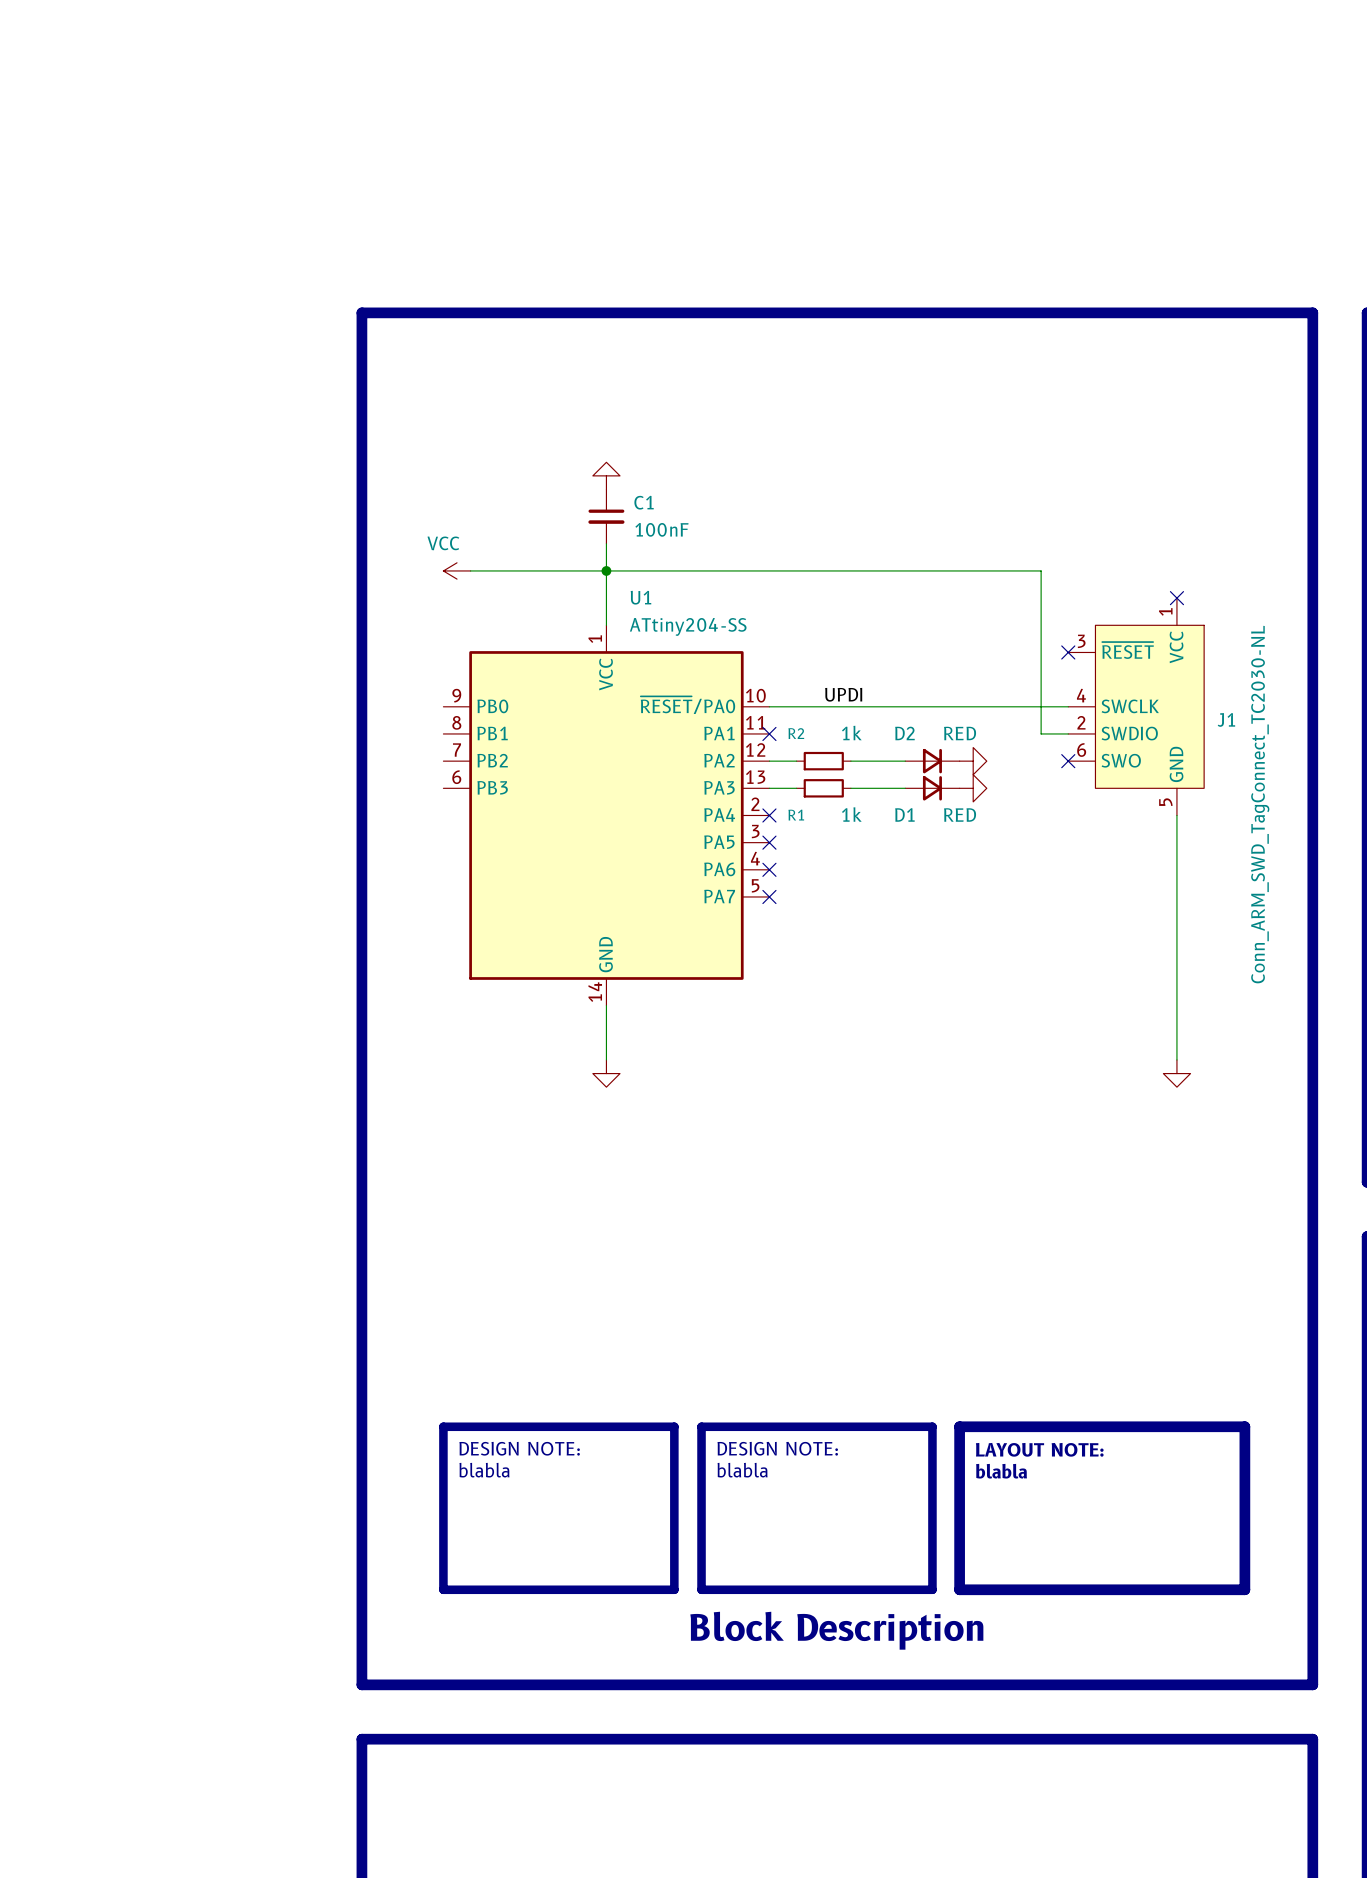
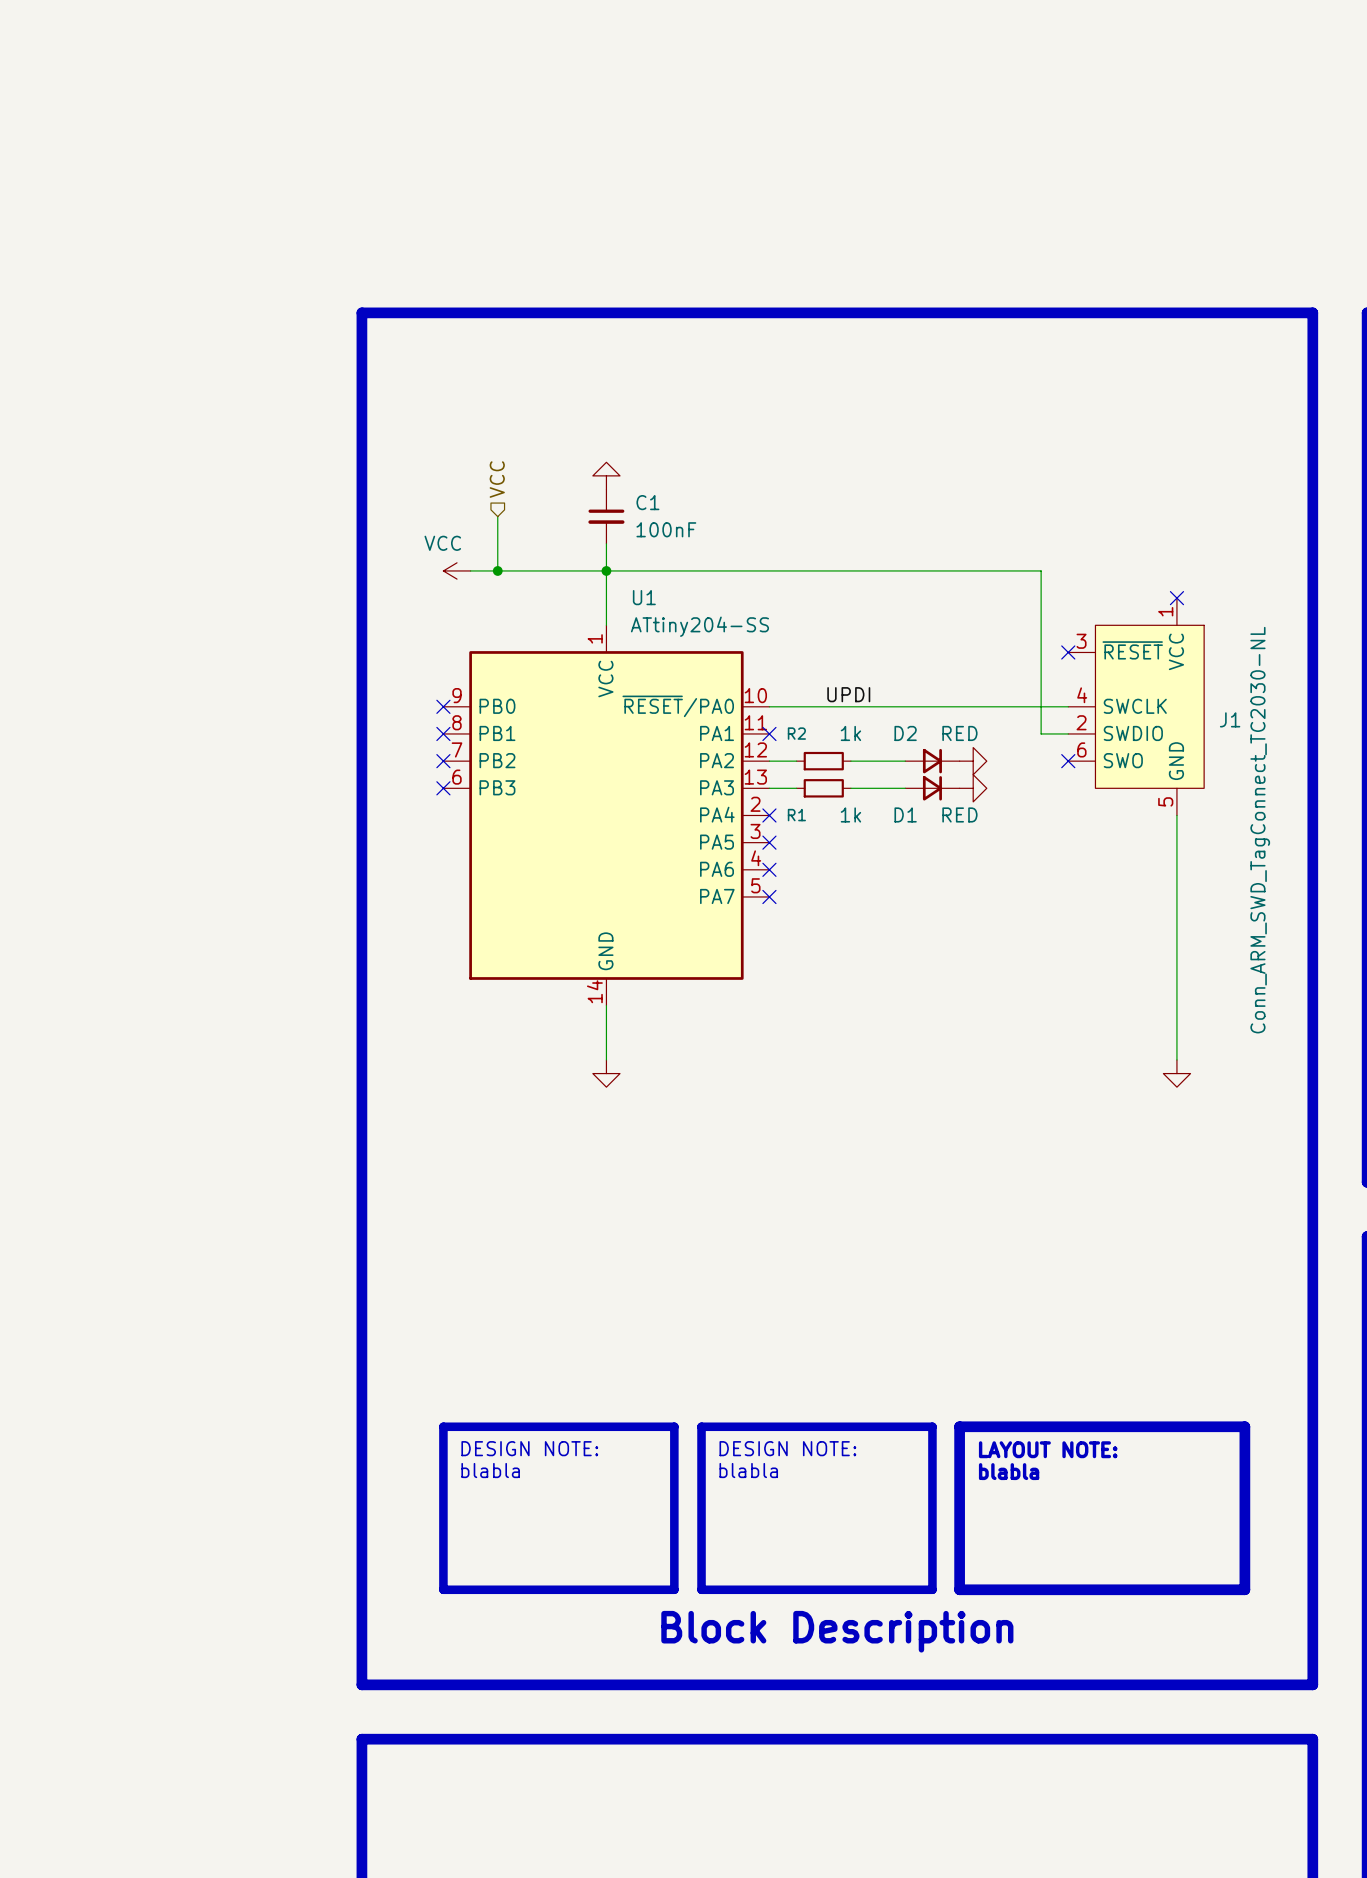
hierarchical label: none -> VCC (497, 479)
wire: none -> (497, 516) (497, 570)
junction: none -> (497, 570)
no-connect mark: none -> (443, 706)
no-connect mark: none -> (443, 733)
no-connect mark: none -> (443, 761)
no-connect mark: none -> (443, 788)

